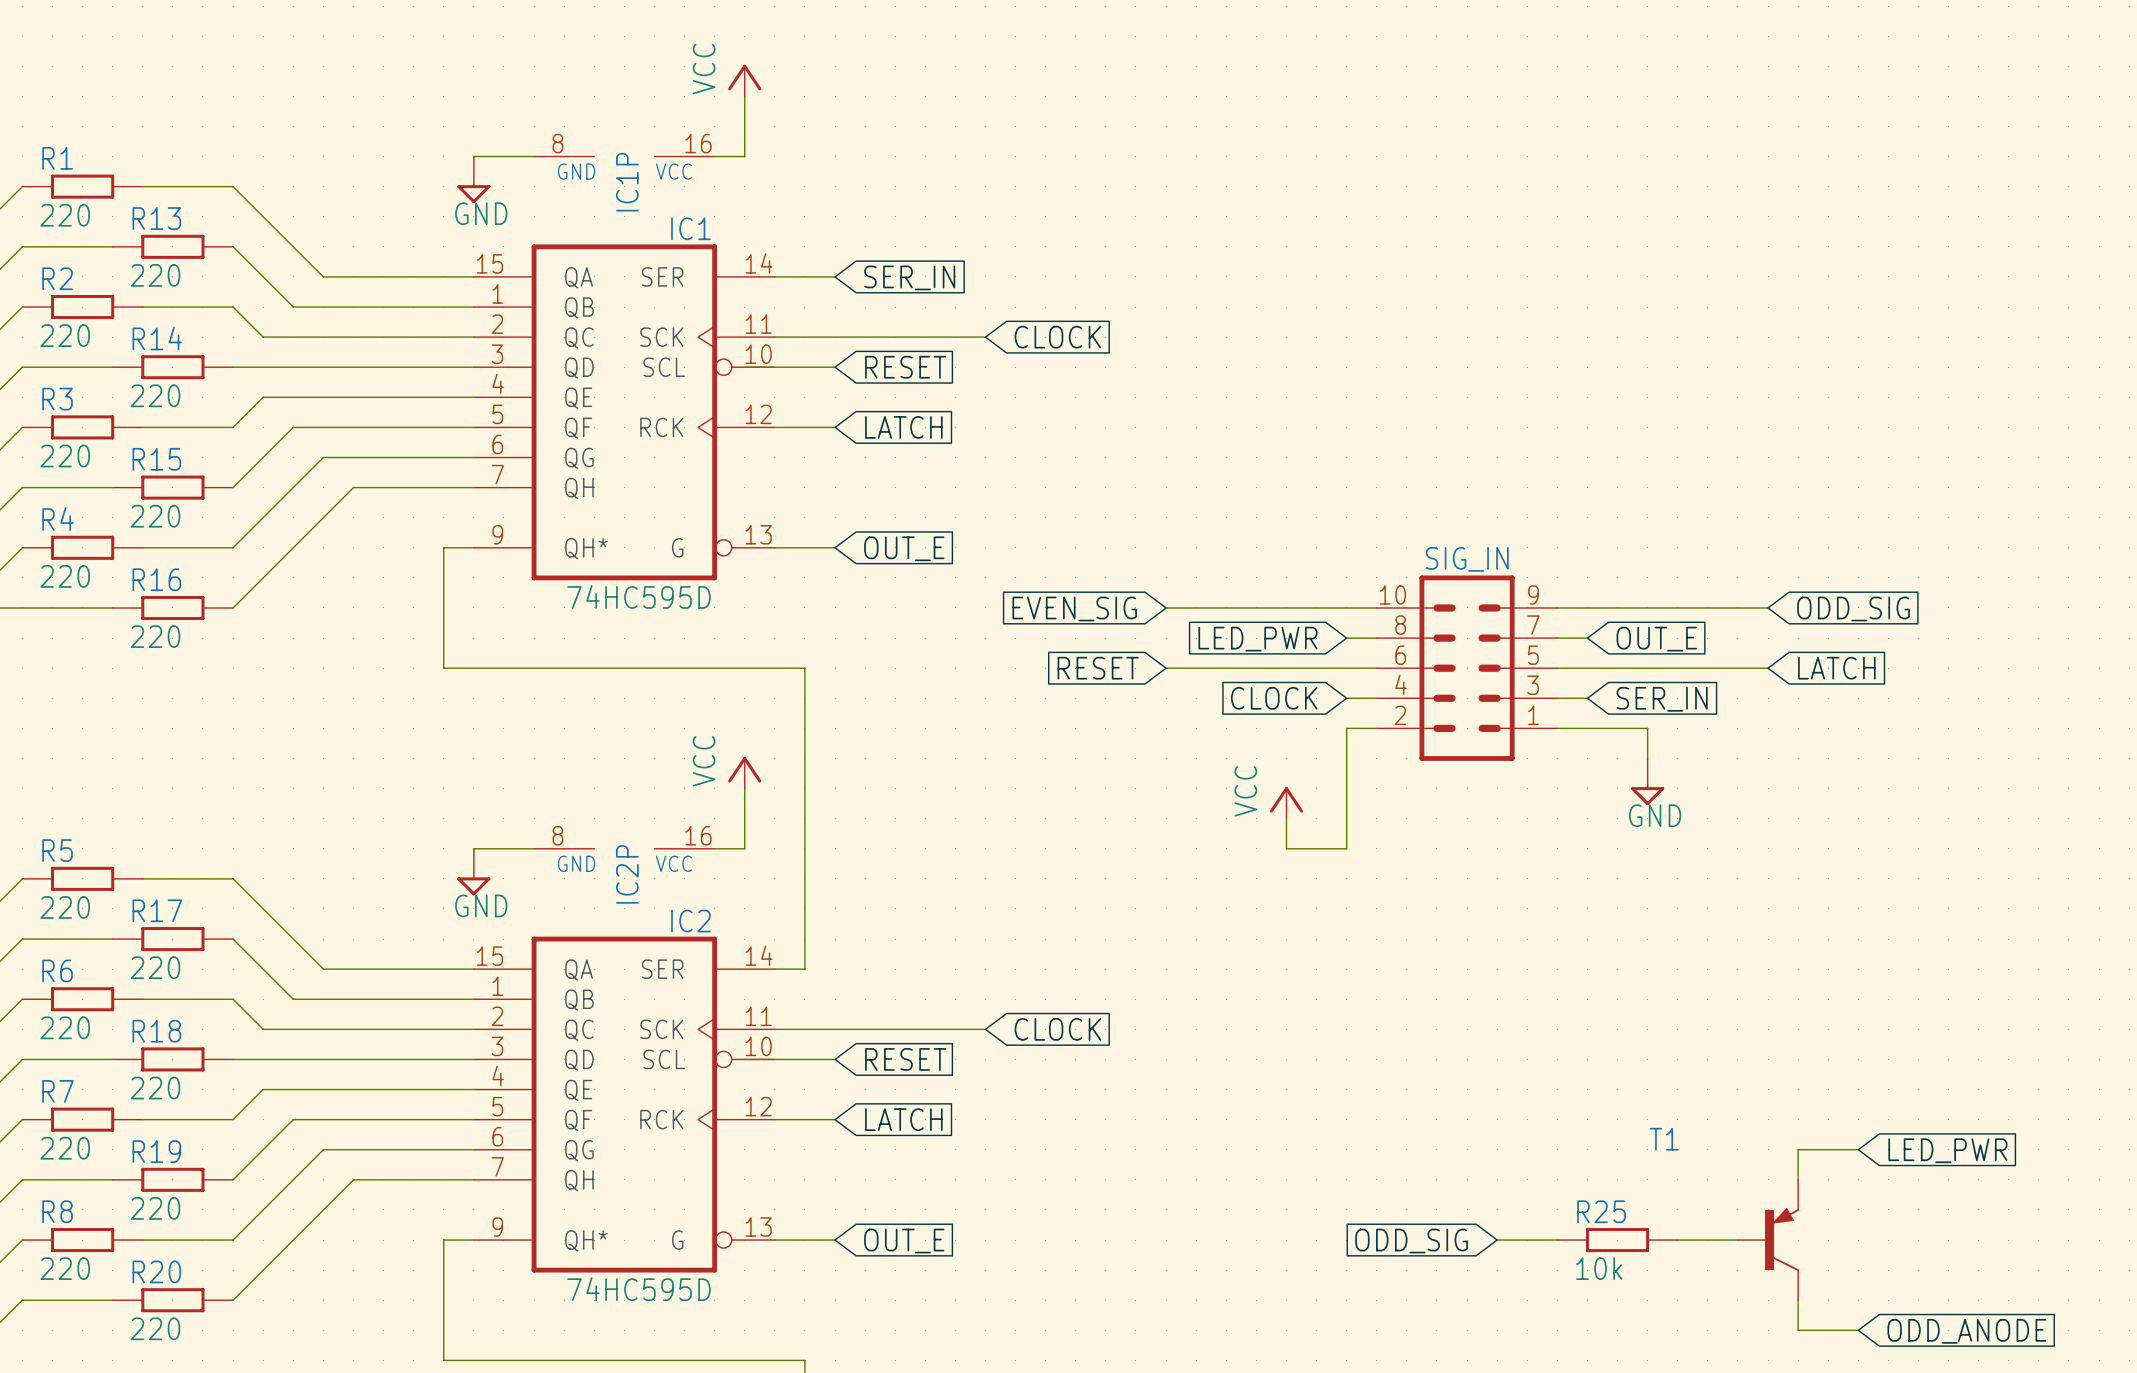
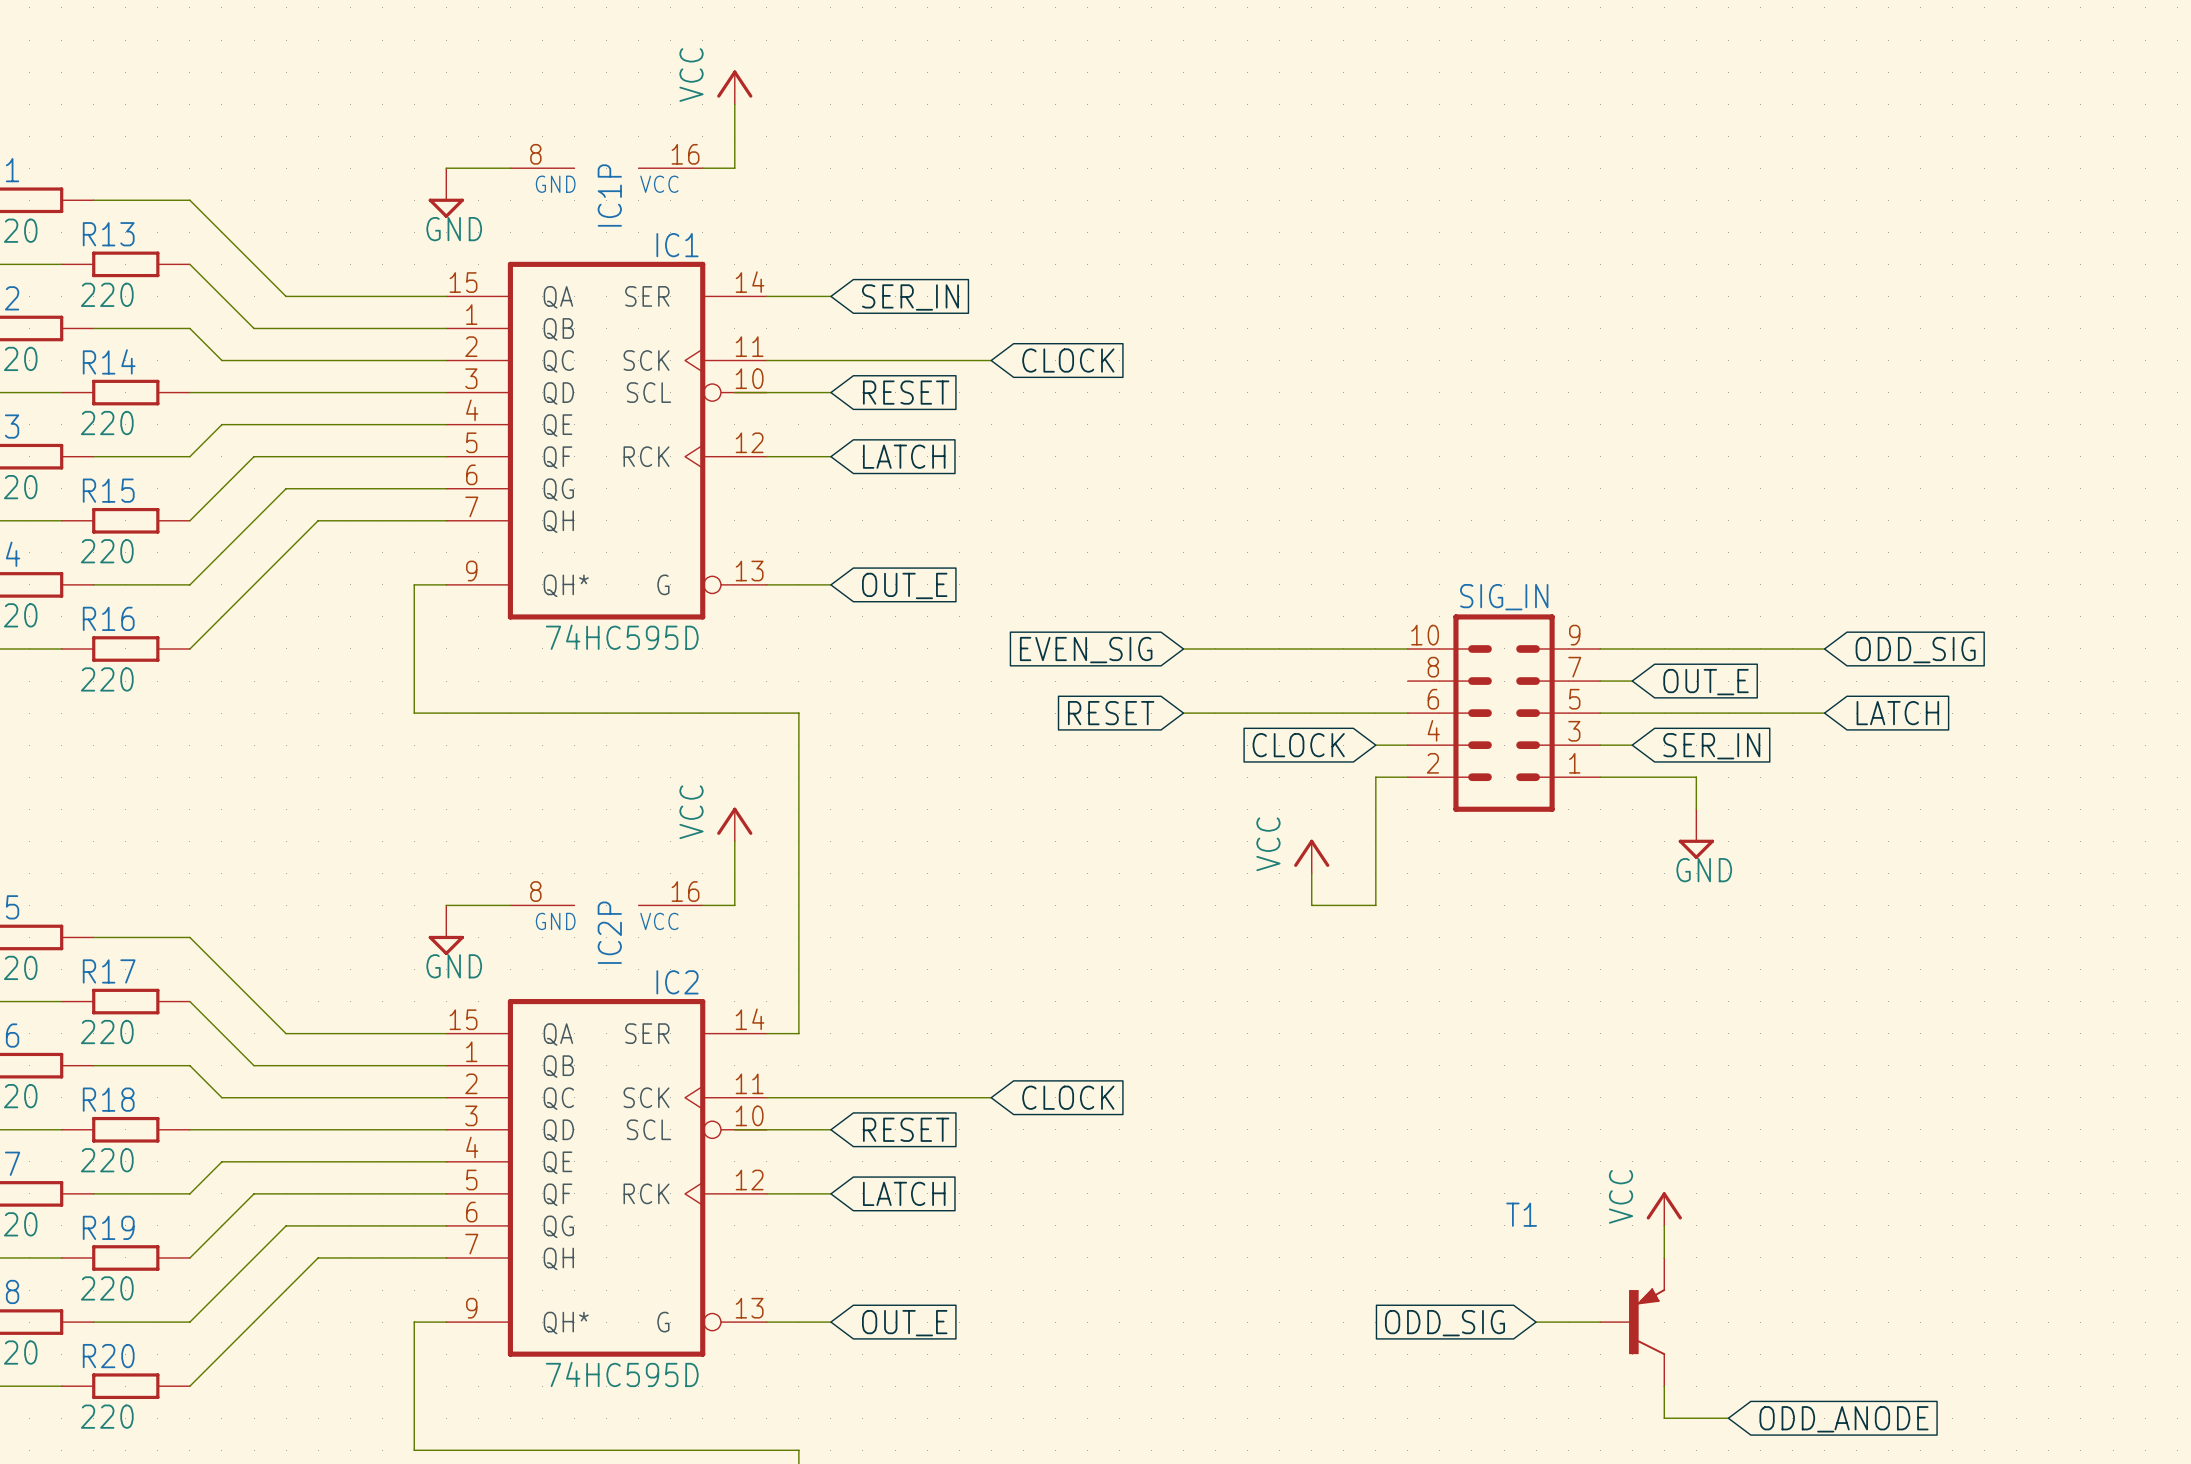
wire: (1346, 638) (1376, 638) -> none
global label: LED_PWR (1257, 639) -> none
power symbol: none -> VCC (1664, 1209)
wire: none -> (1664, 1225) (1664, 1257)
wire: (1858, 1149) (1798, 1149) (1798, 1179) -> none
global label: LED_PWR (1947, 1150) -> none
R25: 10k (1617, 1240) -> none
wire: (1677, 1240) (1737, 1240) -> none
T1 position: (1768, 1240) -> (1632, 1322)
wire: (1798, 1300) (1798, 1330) (1858, 1330) -> (1664, 1386) (1664, 1418) (1728, 1418)
global label position: ODD_ANODE (1966, 1331) -> ODD_ANODE (1844, 1419)

